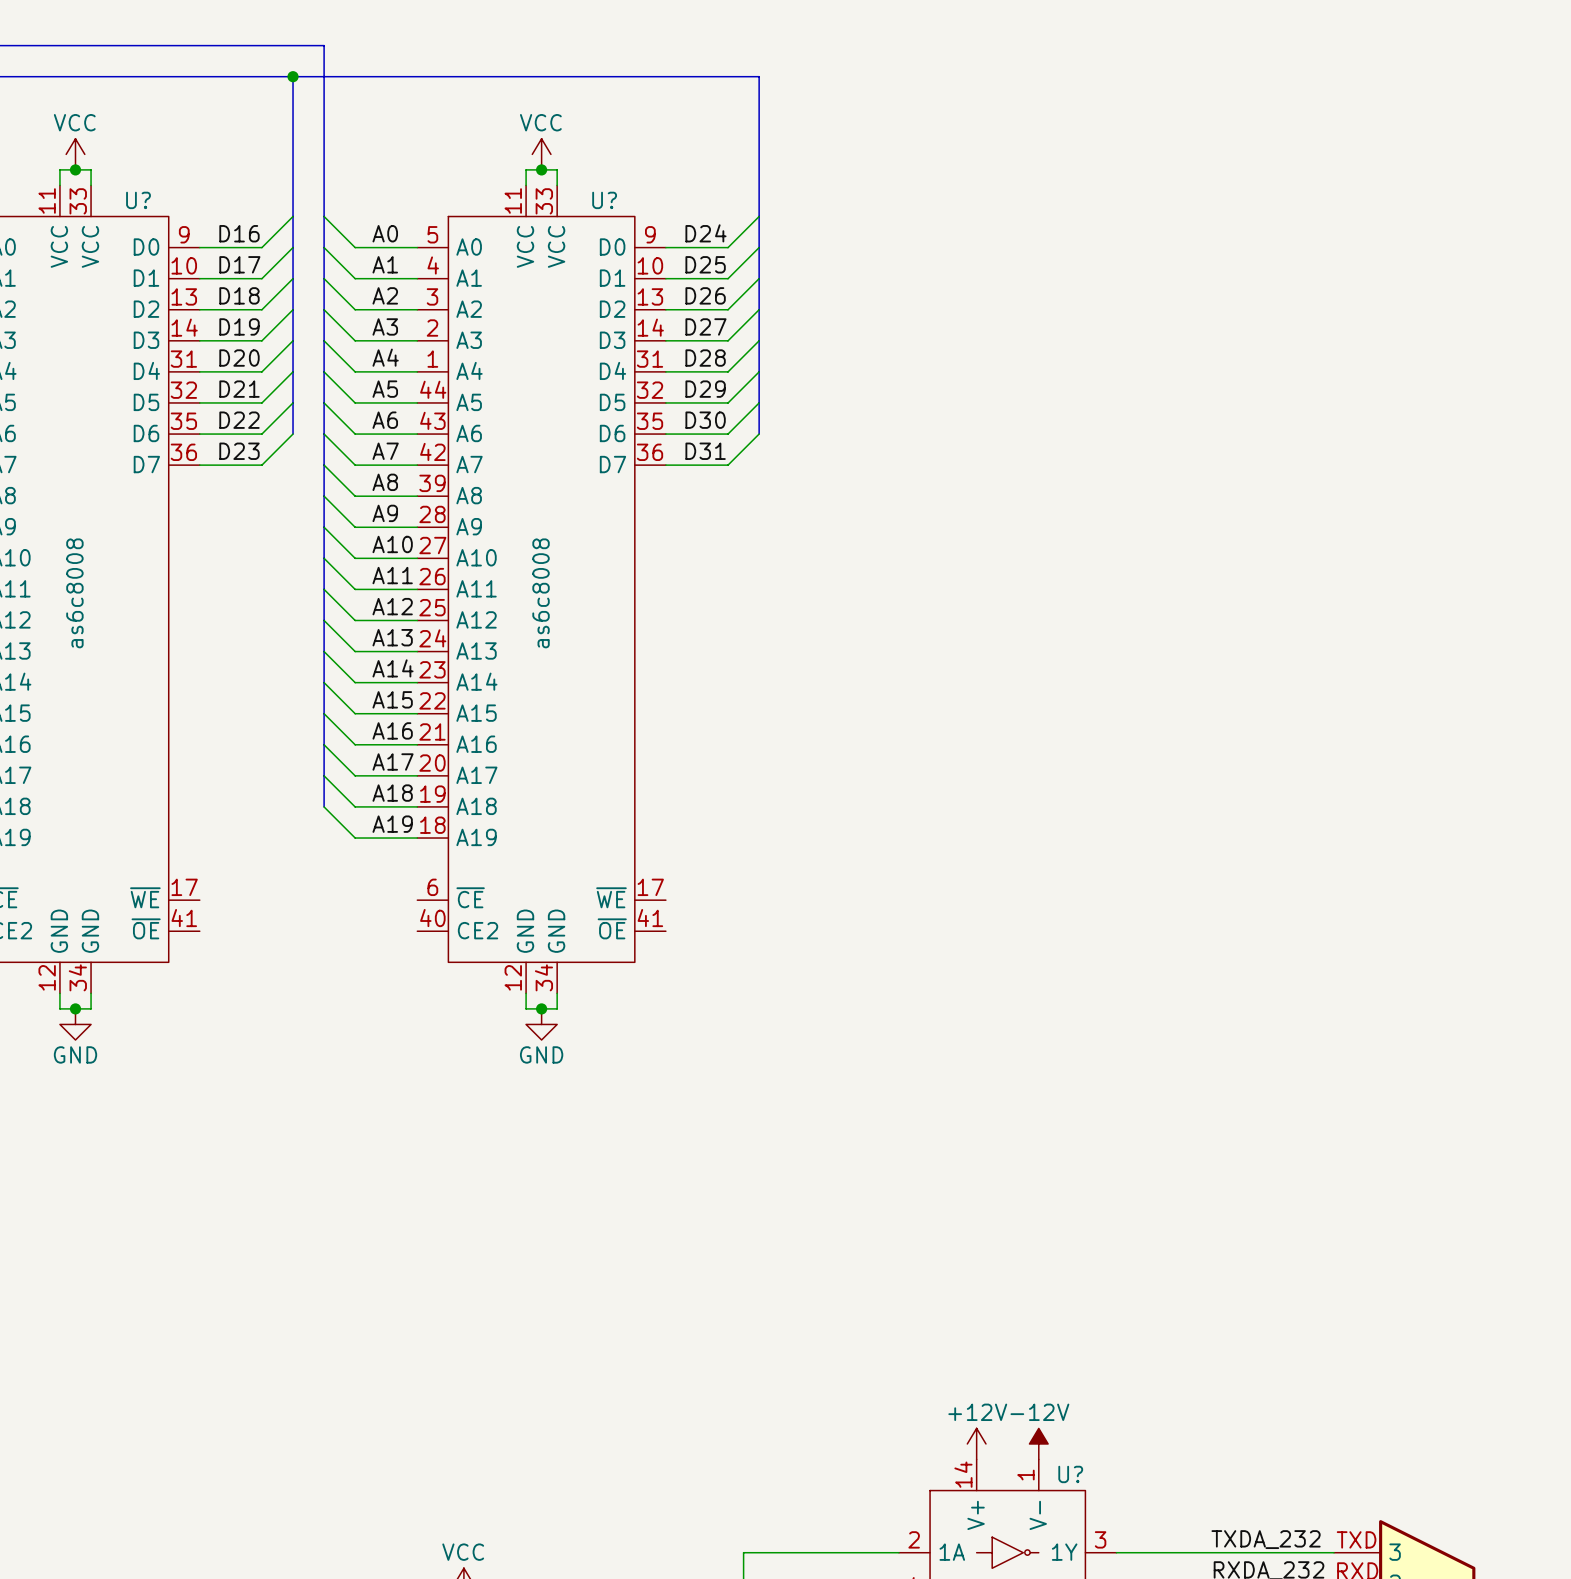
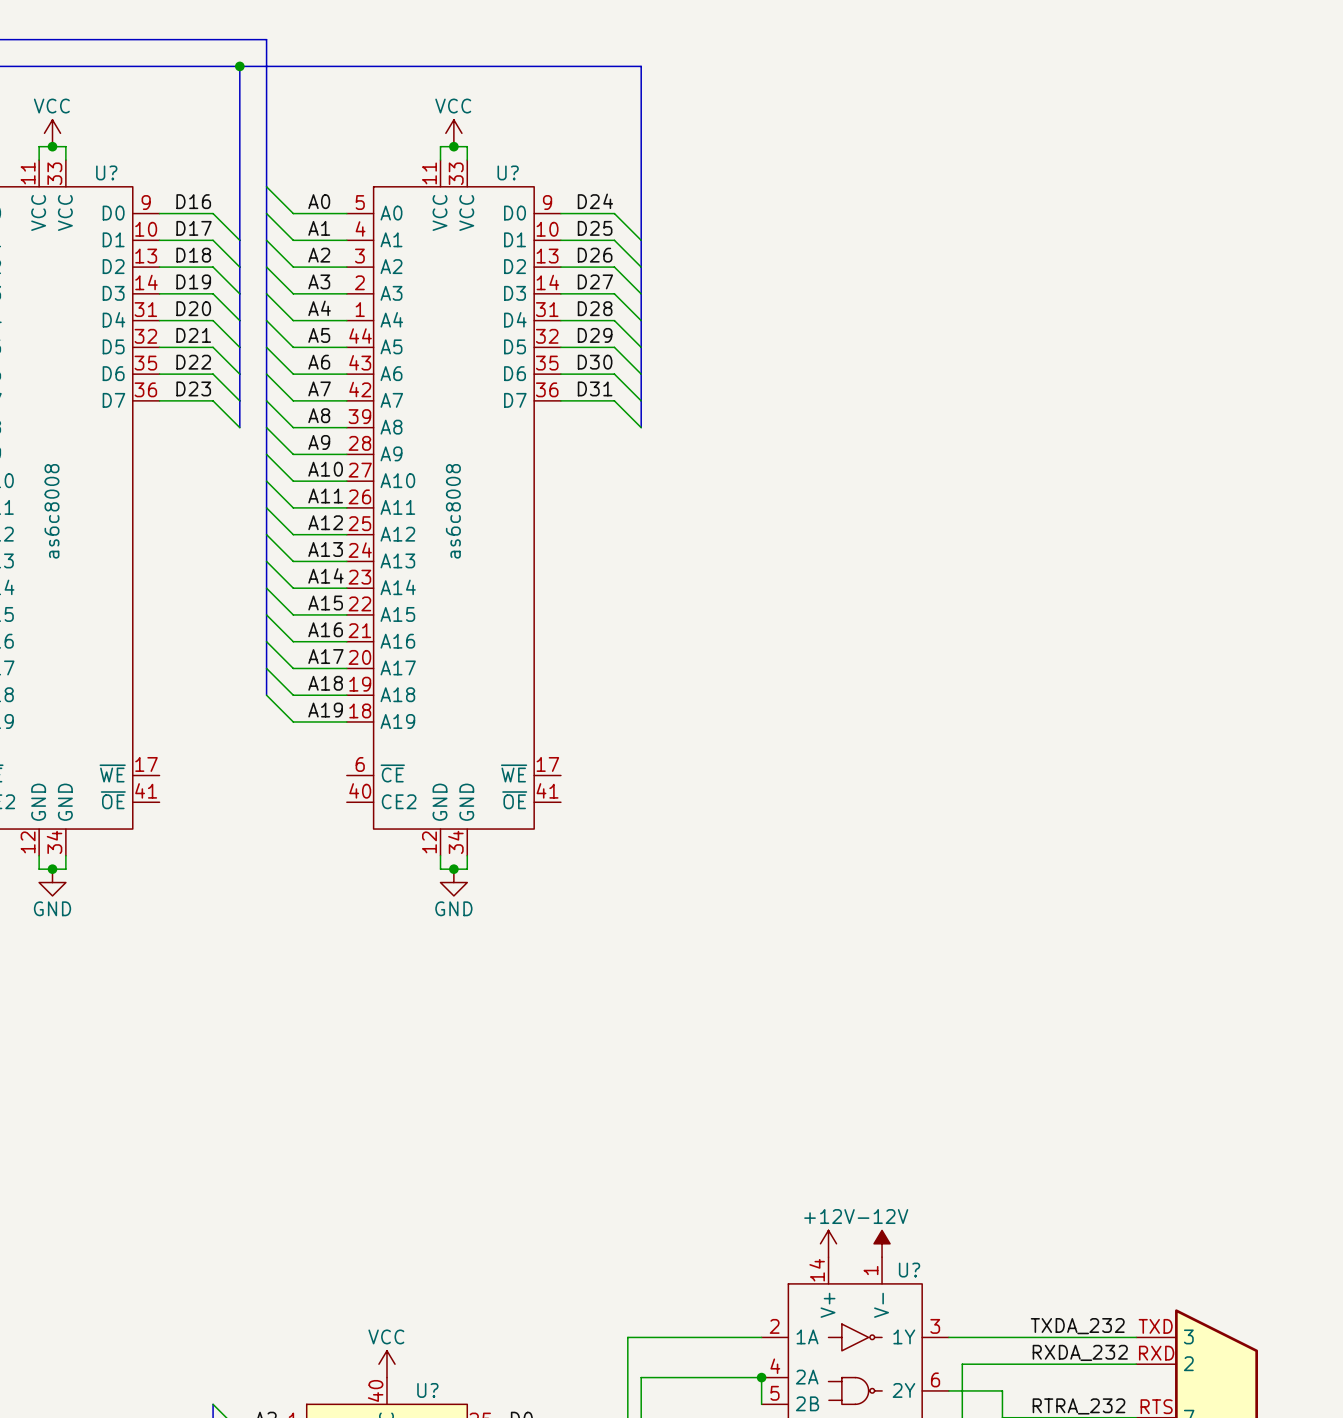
wire: (293, 216) (261, 247) -> (239, 240) (213, 213)
wire: (759, 216) (728, 247) -> (641, 240) (614, 213)
wire: (293, 247) (261, 278) -> (239, 267) (213, 240)
wire: (759, 247) (728, 278) -> (641, 267) (614, 240)
wire: (293, 278) (261, 309) -> (239, 293) (213, 267)
wire: (759, 278) (728, 309) -> (641, 293) (614, 267)
wire: (293, 309) (261, 340) -> (239, 320) (213, 293)
wire: (759, 309) (728, 340) -> (641, 320) (614, 293)
wire: (293, 340) (261, 371) -> (239, 347) (213, 320)
wire: (759, 340) (728, 371) -> (641, 347) (614, 320)
wire: (293, 371) (261, 402) -> (239, 374) (213, 347)
wire: (759, 371) (728, 402) -> (641, 374) (614, 347)
wire: (293, 402) (261, 434) -> (239, 400) (213, 374)
wire: (759, 402) (728, 434) -> (641, 400) (614, 374)
wire: (293, 434) (261, 465) -> (239, 427) (213, 400)
bus: none -> (239, 374) (239, 427)
wire: (759, 434) (728, 465) -> (641, 427) (614, 400)
bus: none -> (641, 374) (641, 427)

